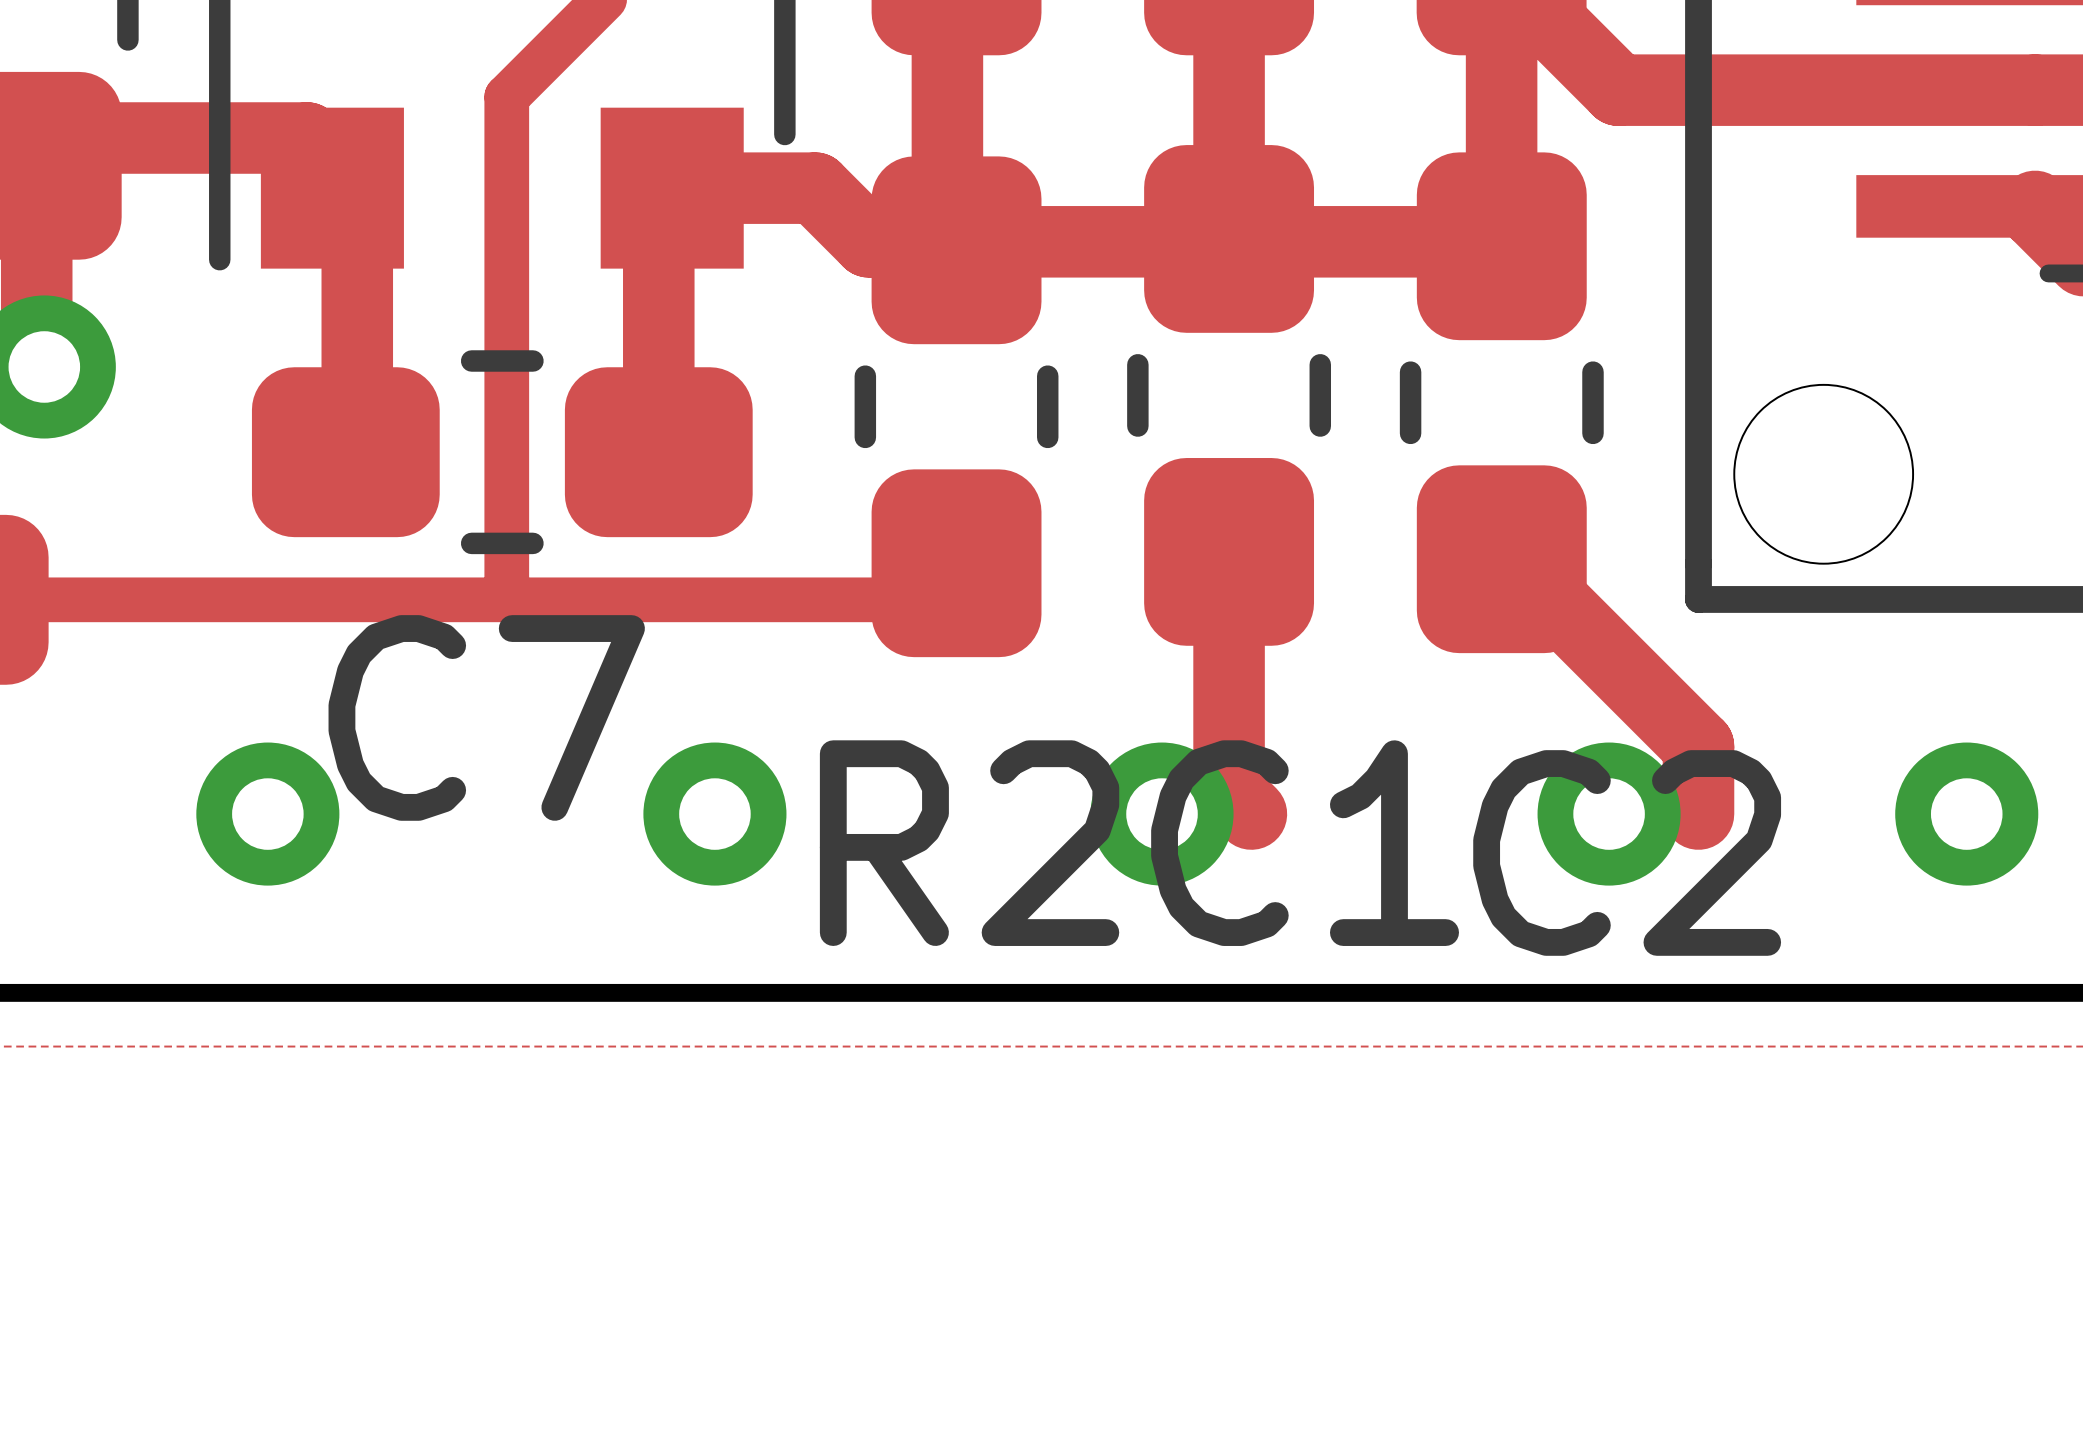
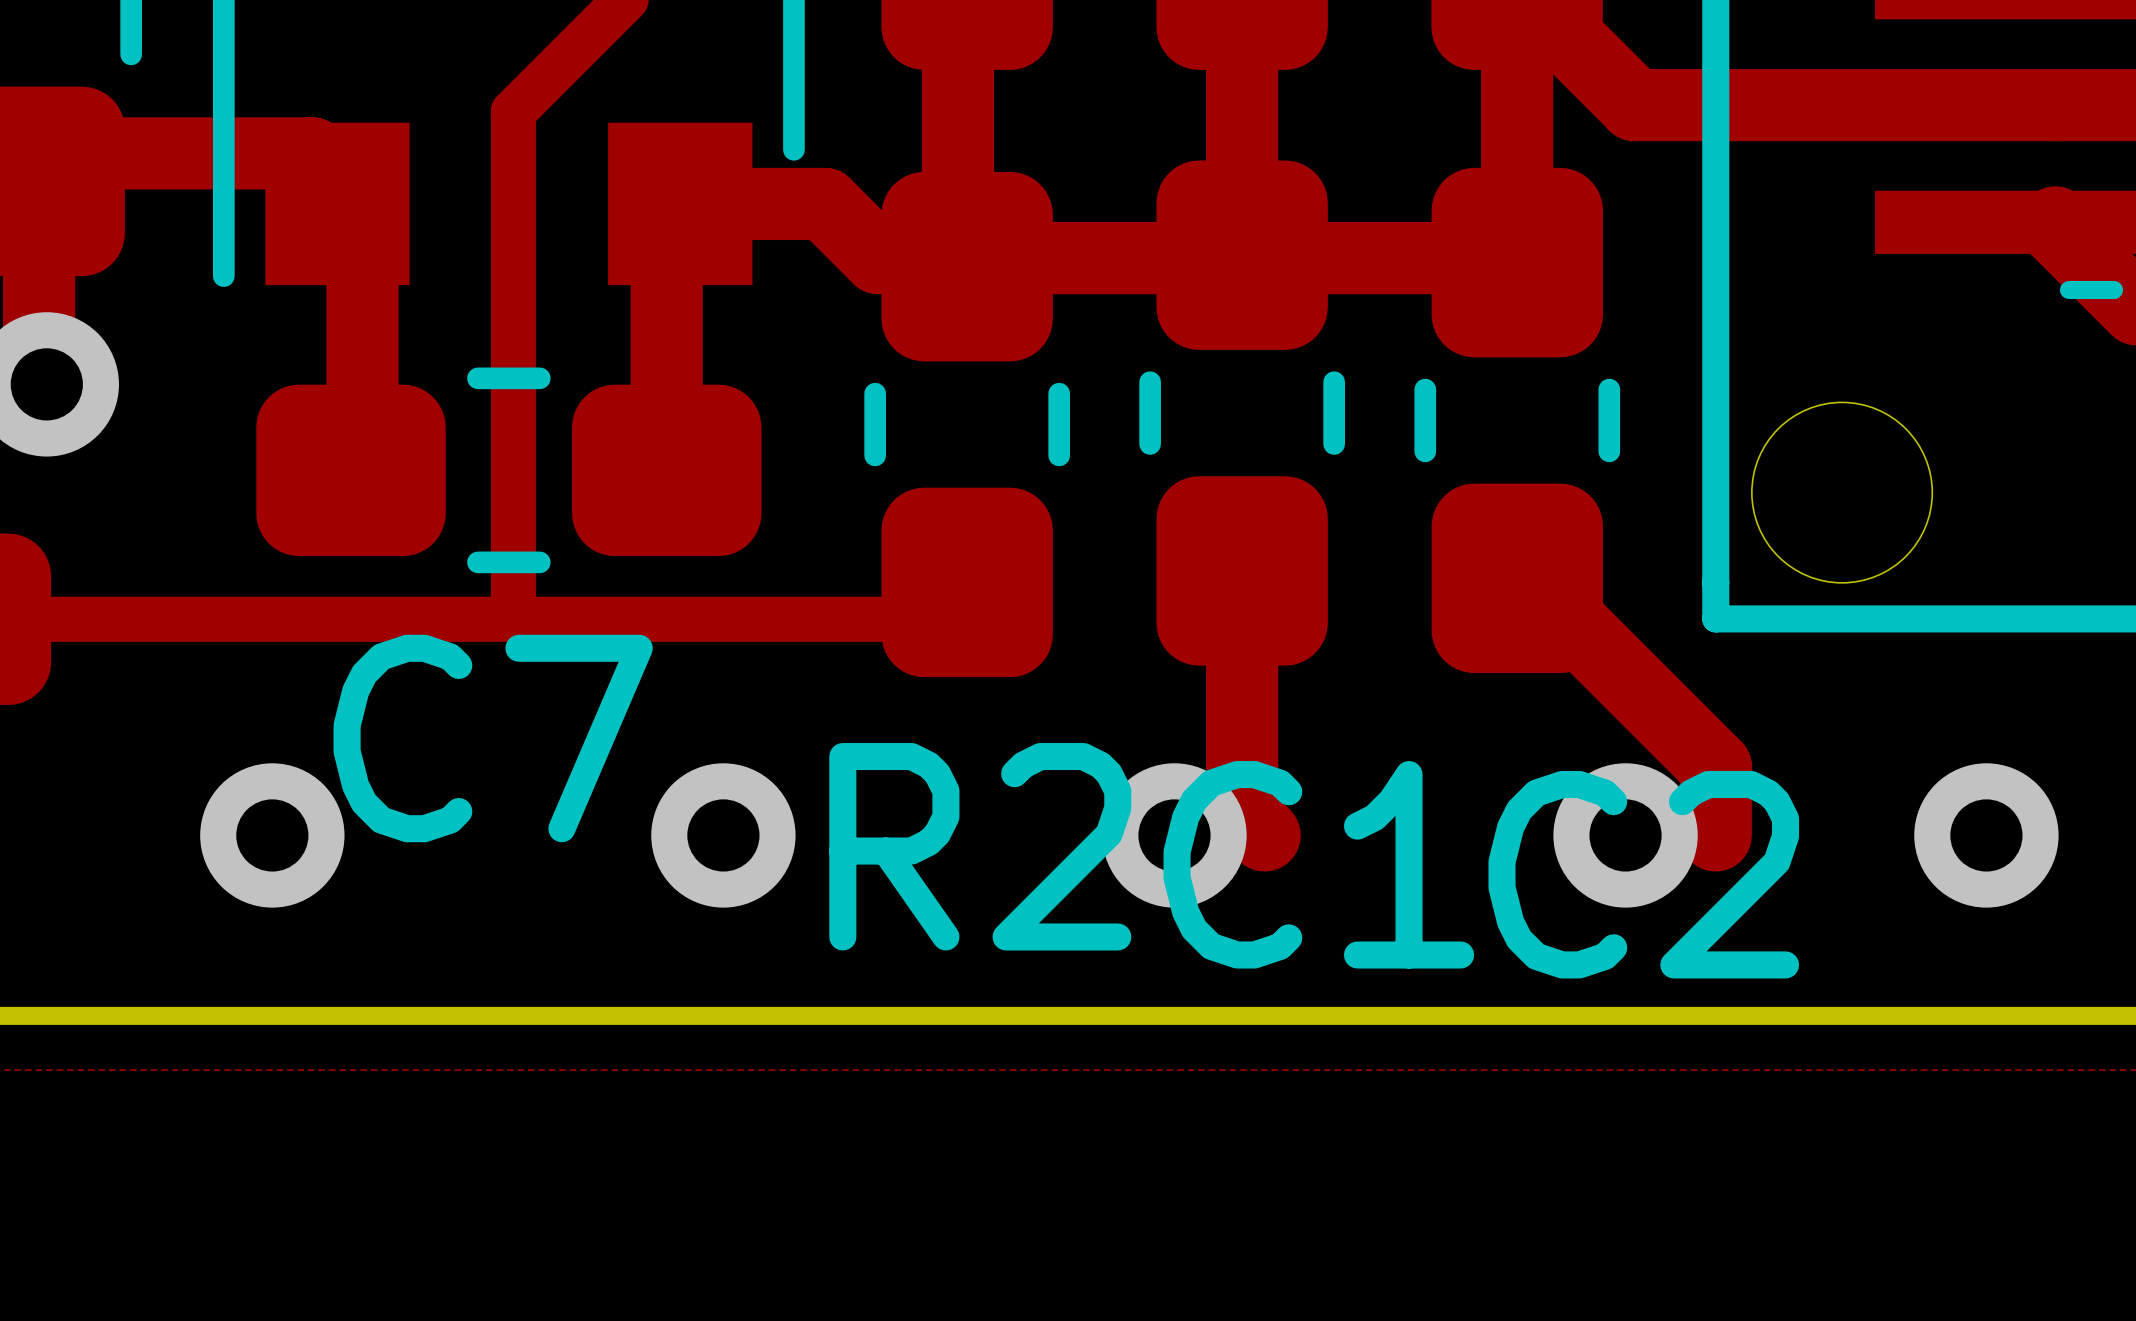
R2 name position: R2 (969, 843) -> R2 (980, 846)

